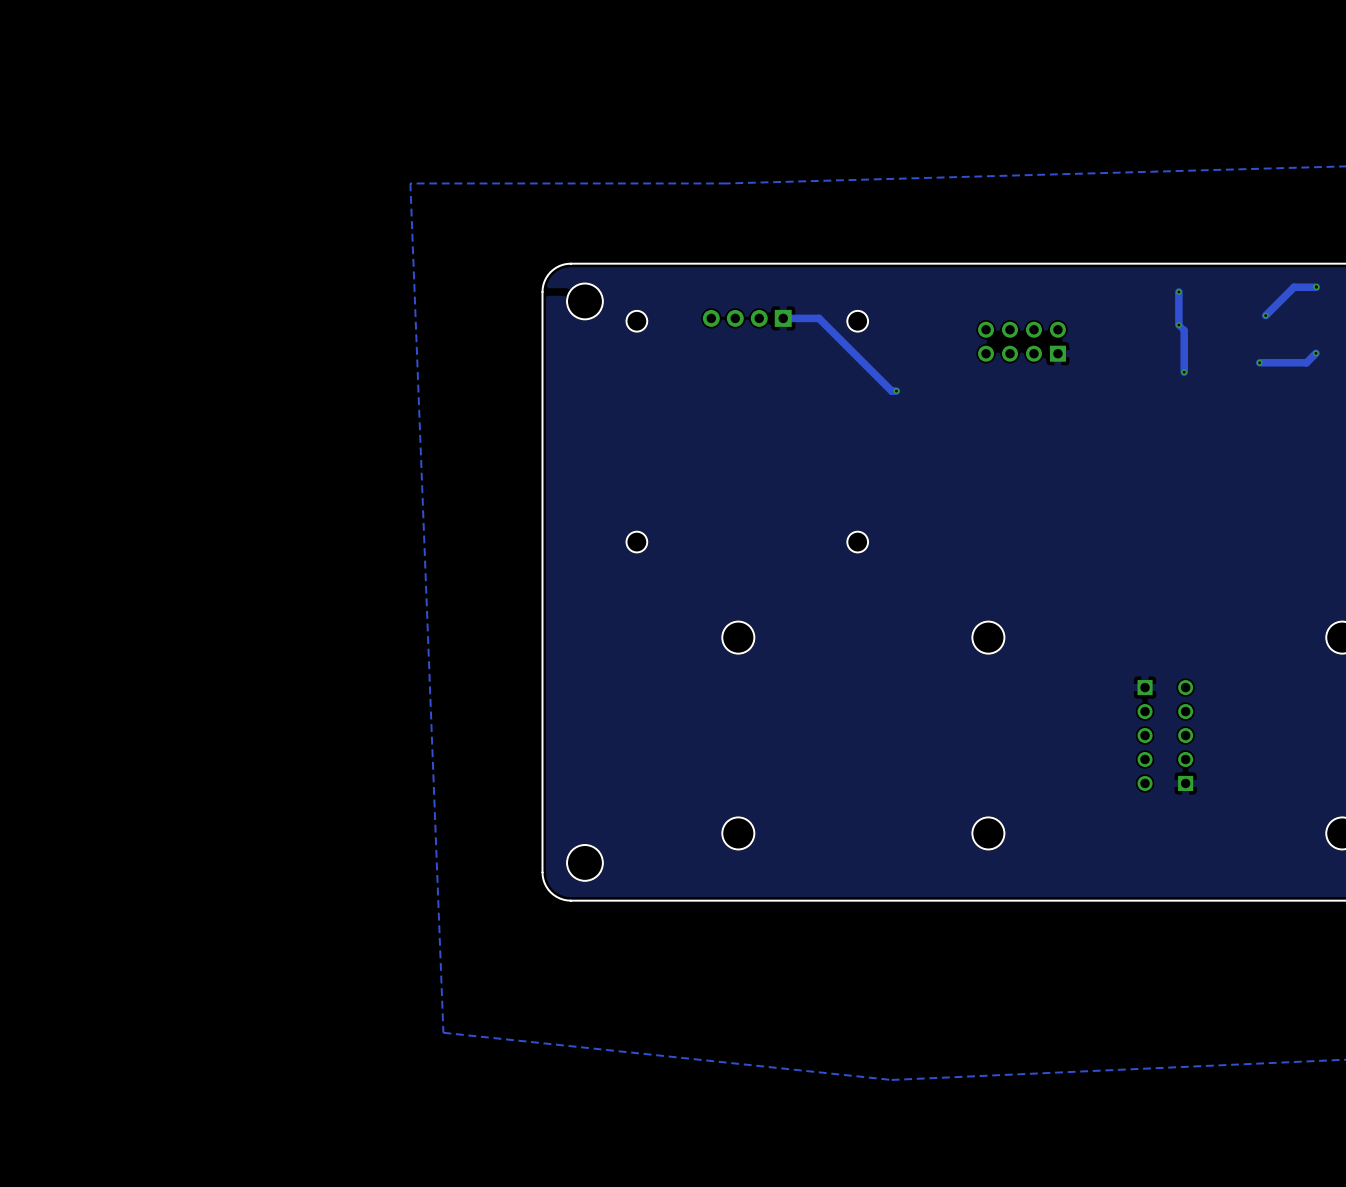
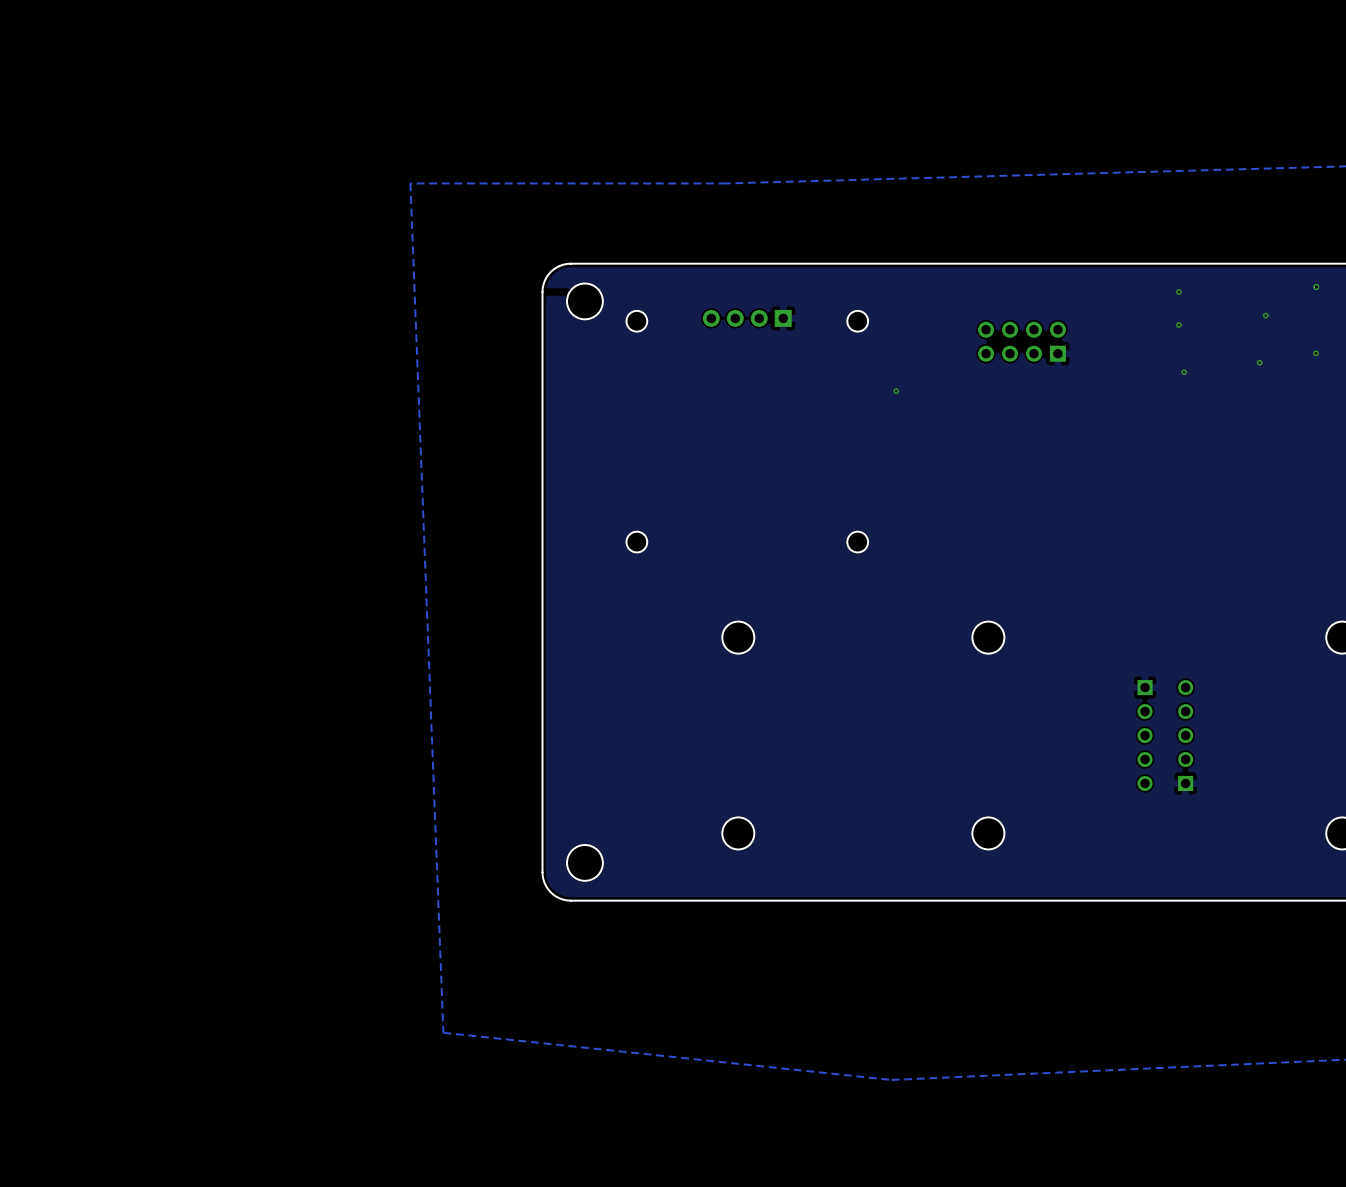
track: (1316, 287) (1294, 287) (1265, 315) -> none
track: (1178, 291) (1178, 325) (1184, 330) (1184, 372) -> none
track: (783, 318) (819, 318) (891, 391) (896, 391) -> none
track: (1315, 353) (1306, 362) (1259, 362) -> none

